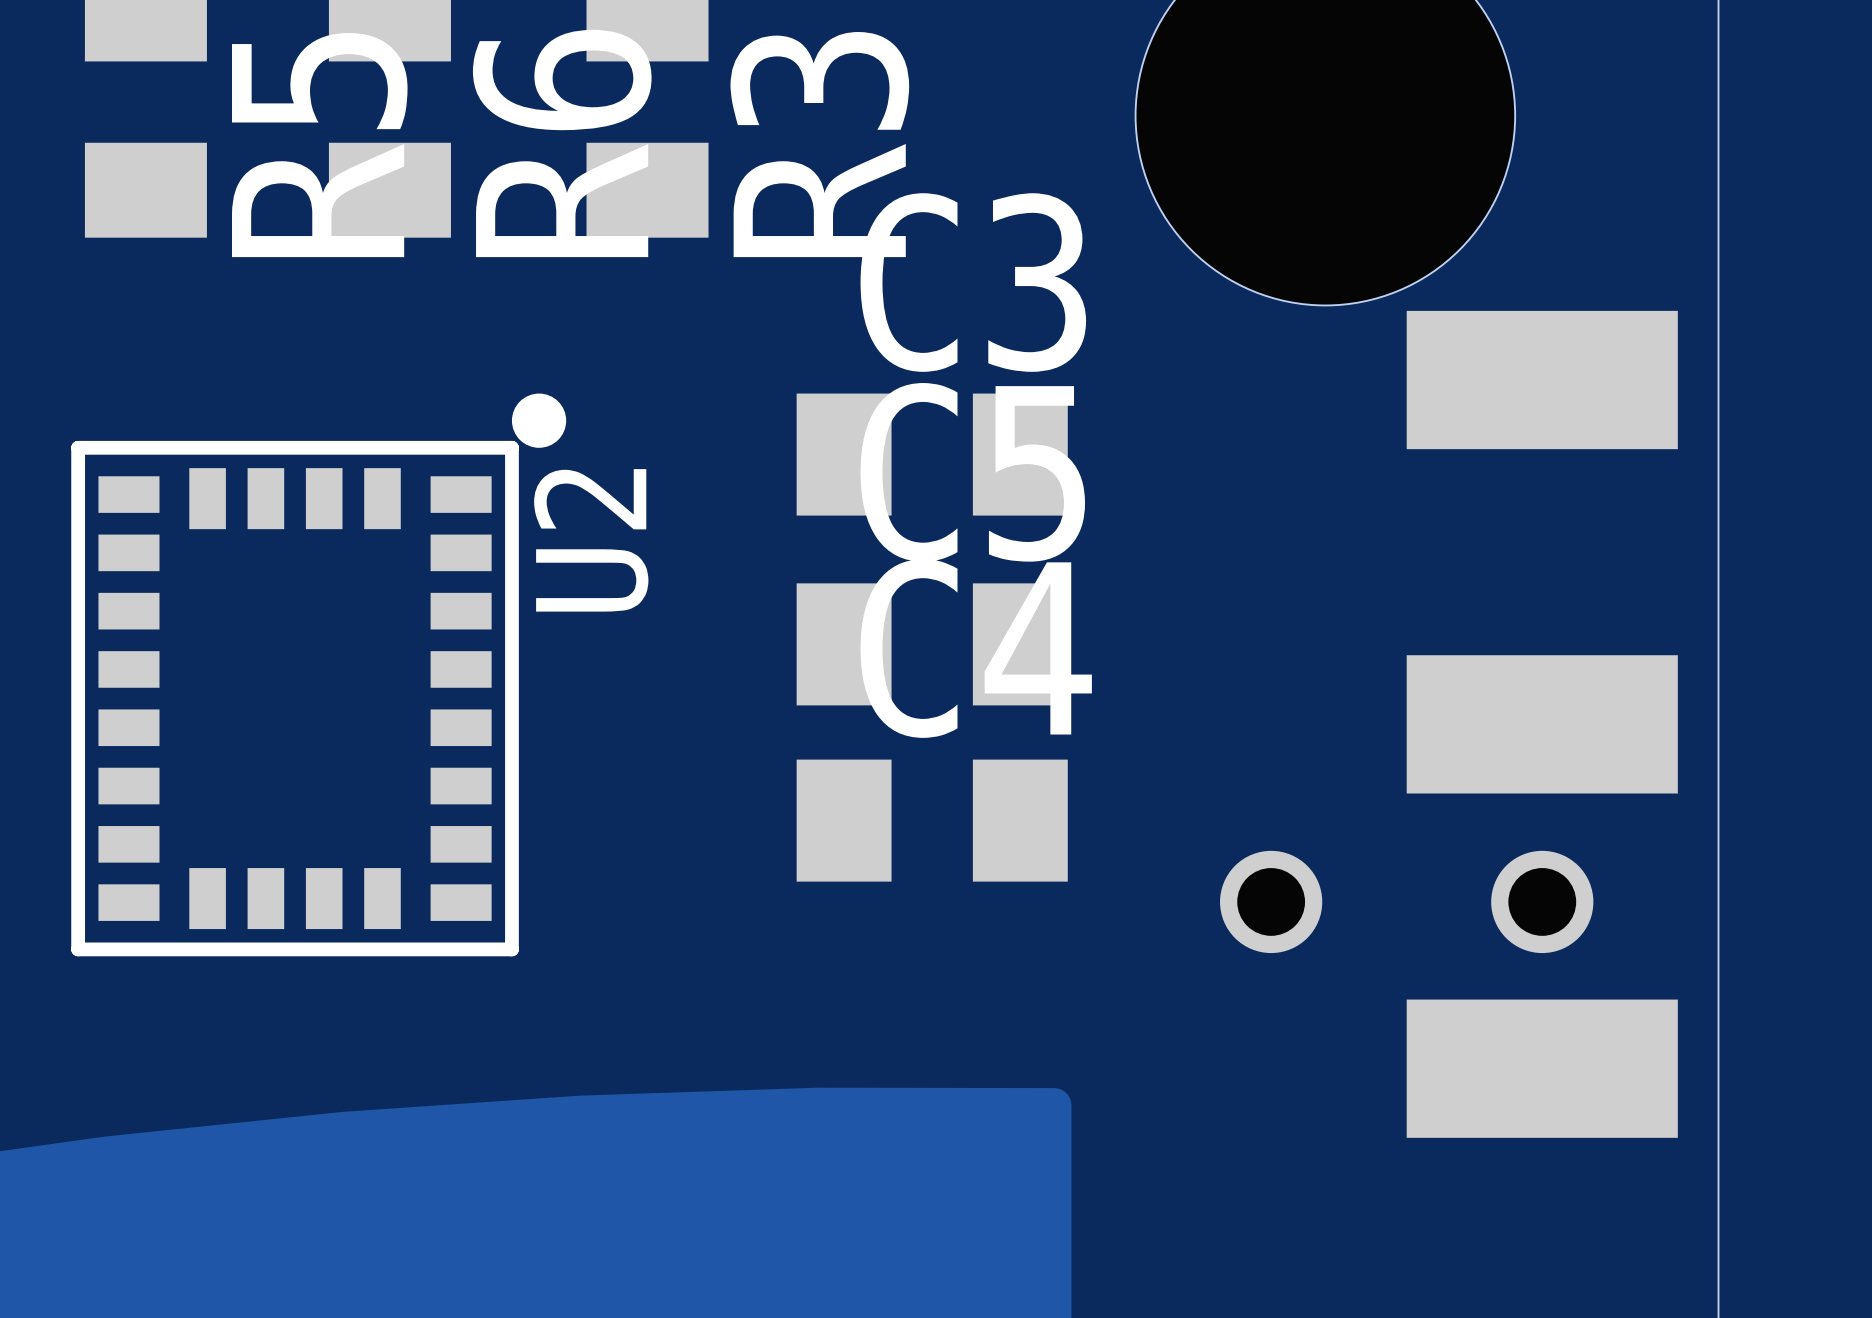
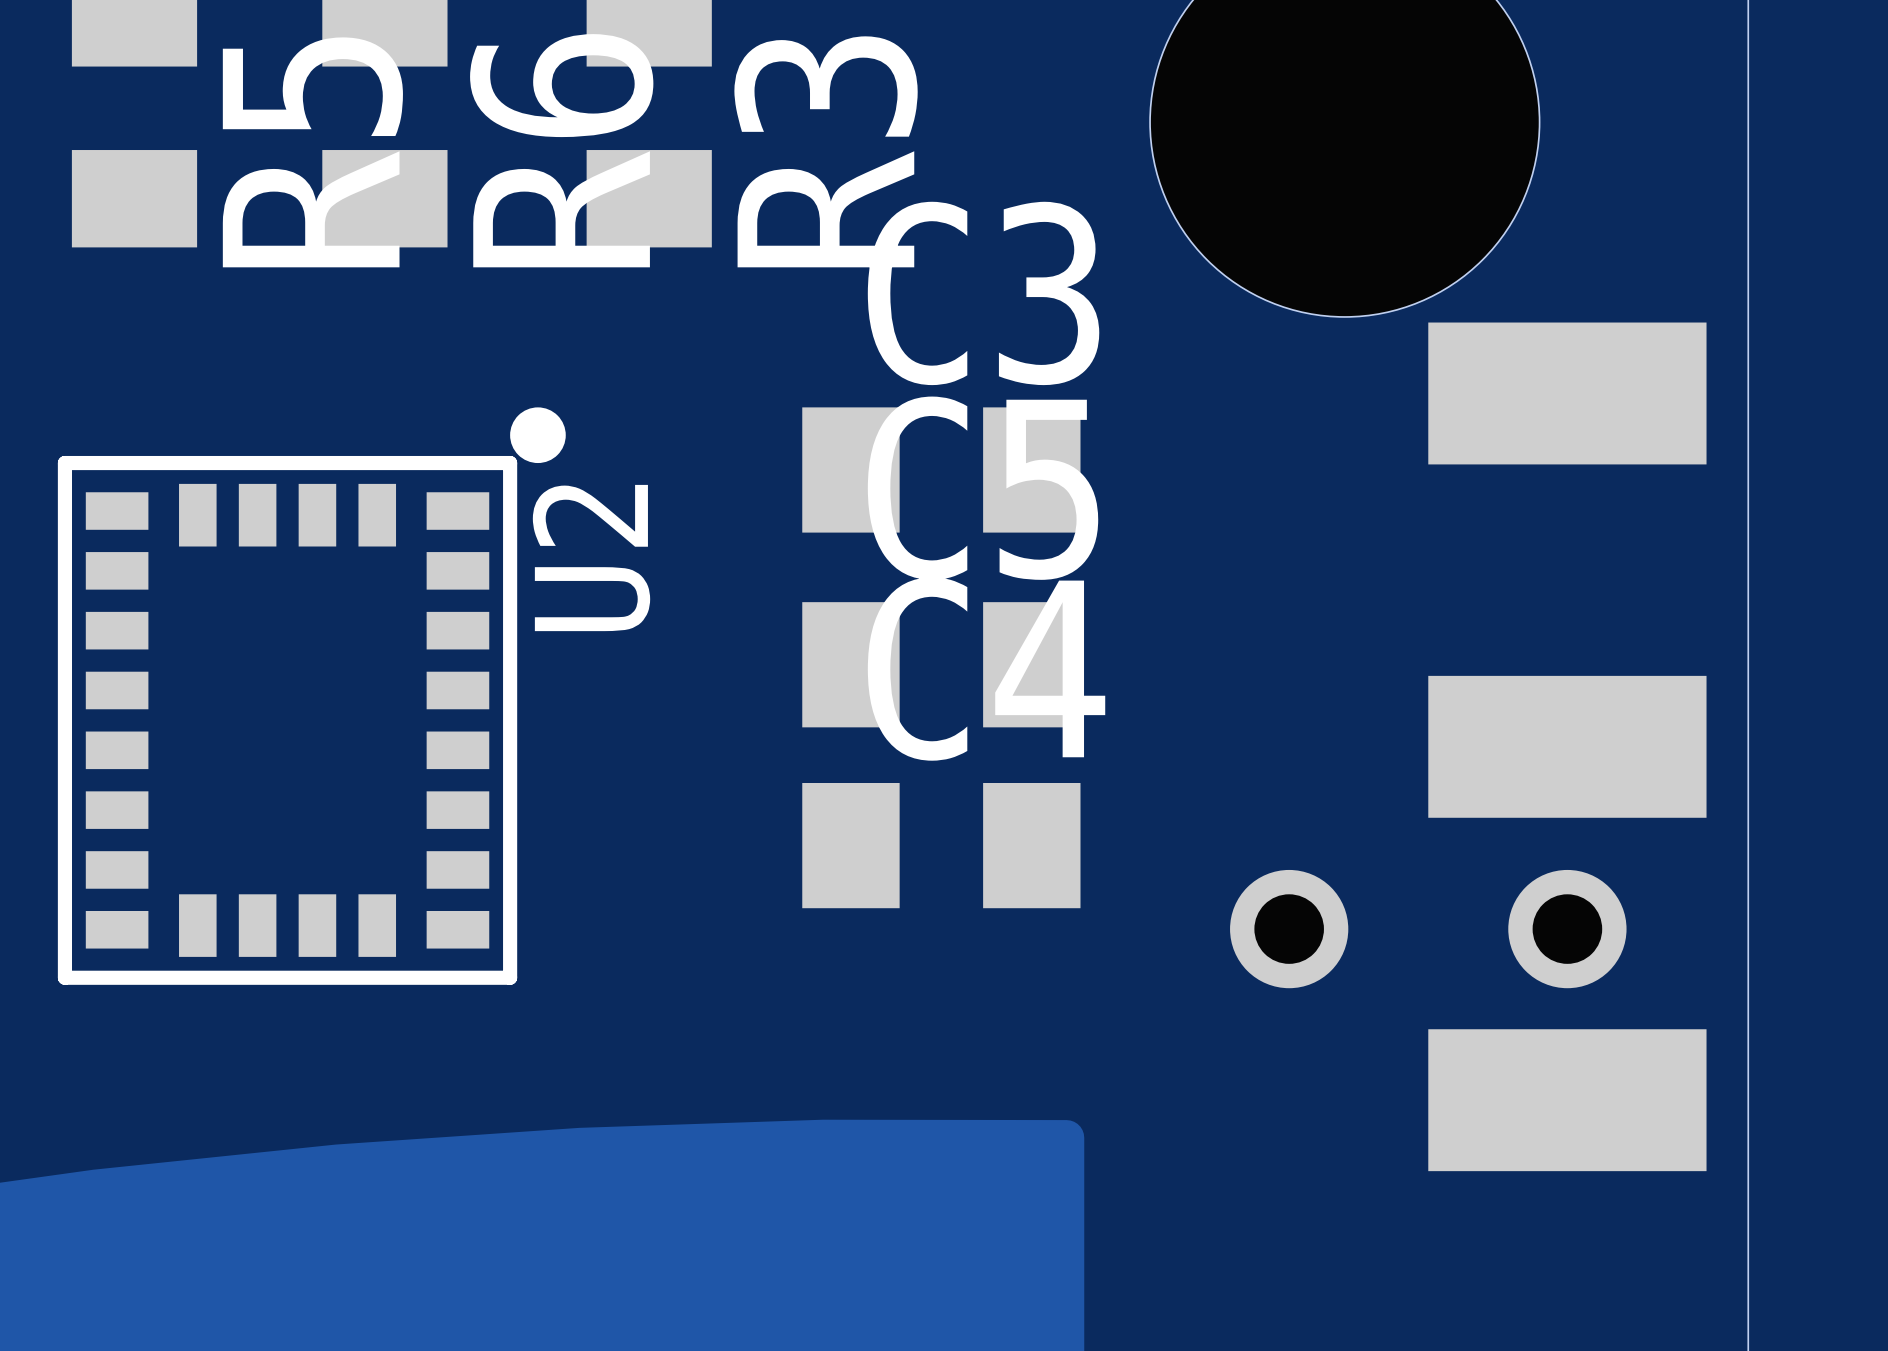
part footprint: [1220, 850, 1594, 954] -> [1230, 869, 1627, 989]

